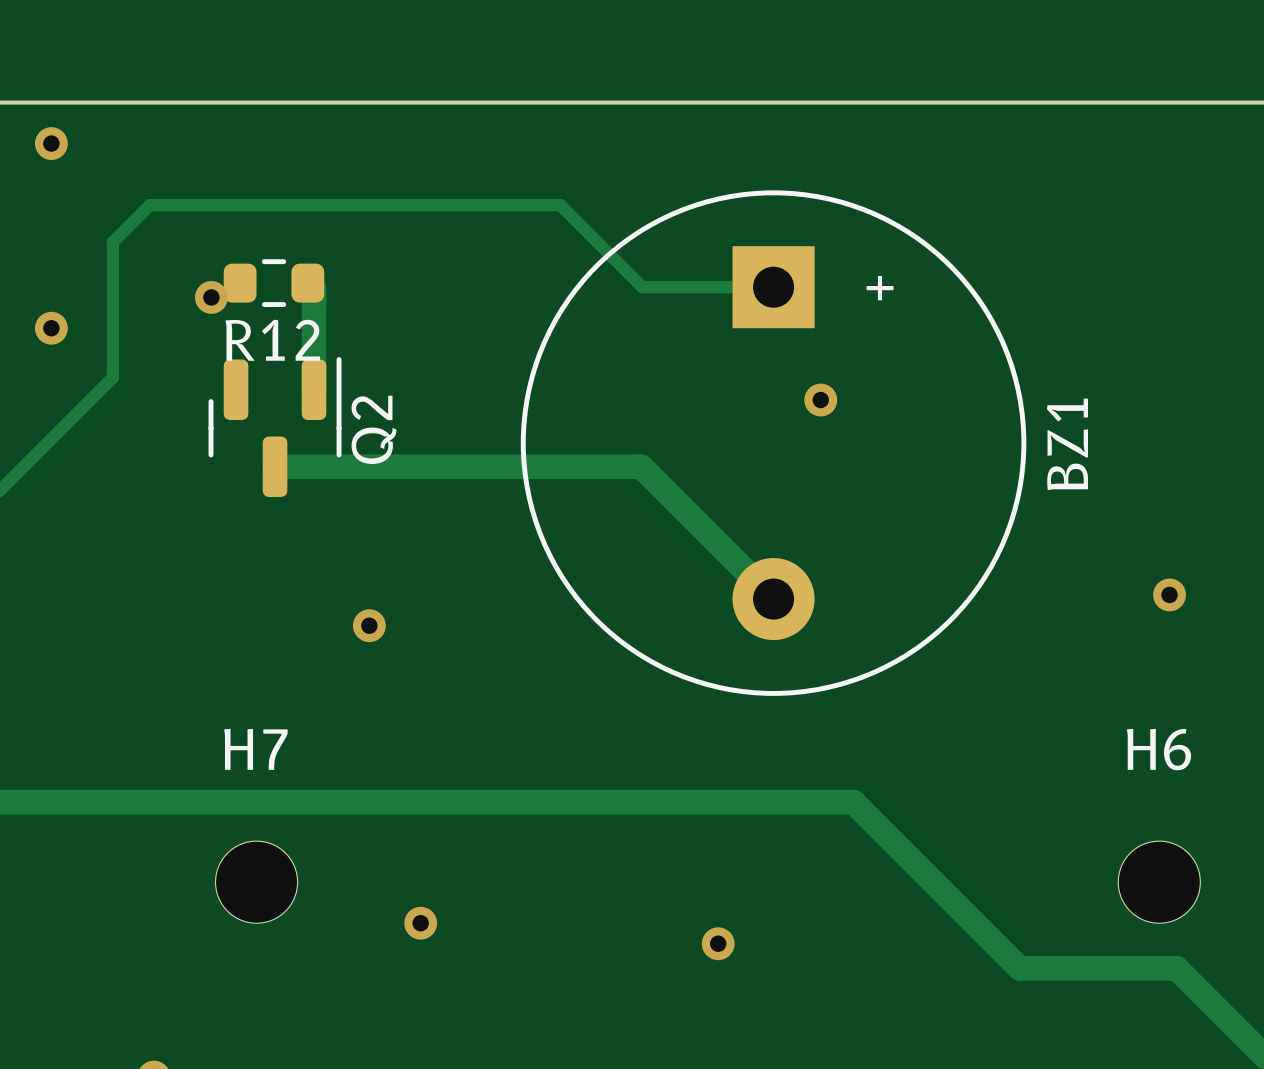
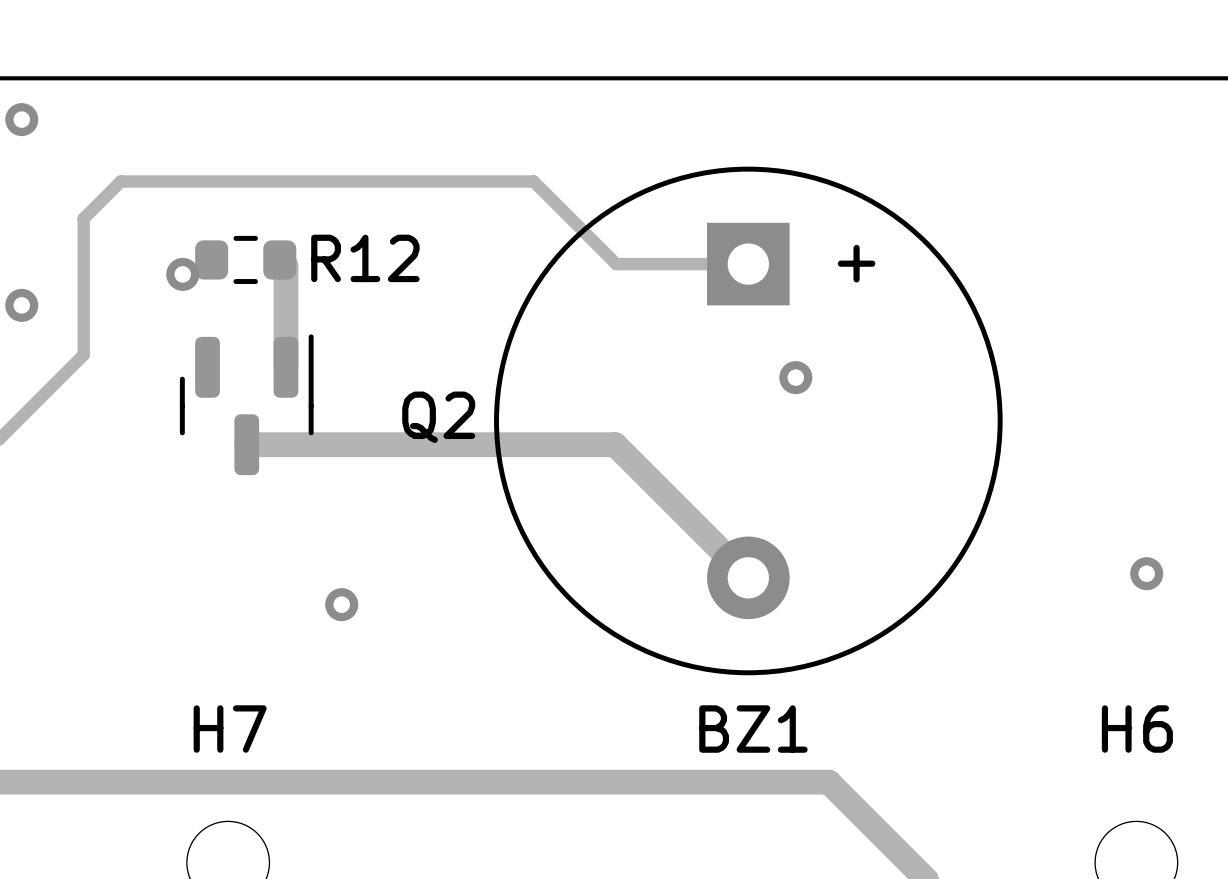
R12 name position: R12 (272, 340) -> R12 (365, 258)
Q2 name rotation: 0° (373, 429) -> 90° clockwise (438, 417)
BZ1 name rotation: 0° (1067, 444) -> 90° clockwise (753, 729)
BZ1 name position: BZ1 (1067, 444) -> BZ1 (753, 729)

